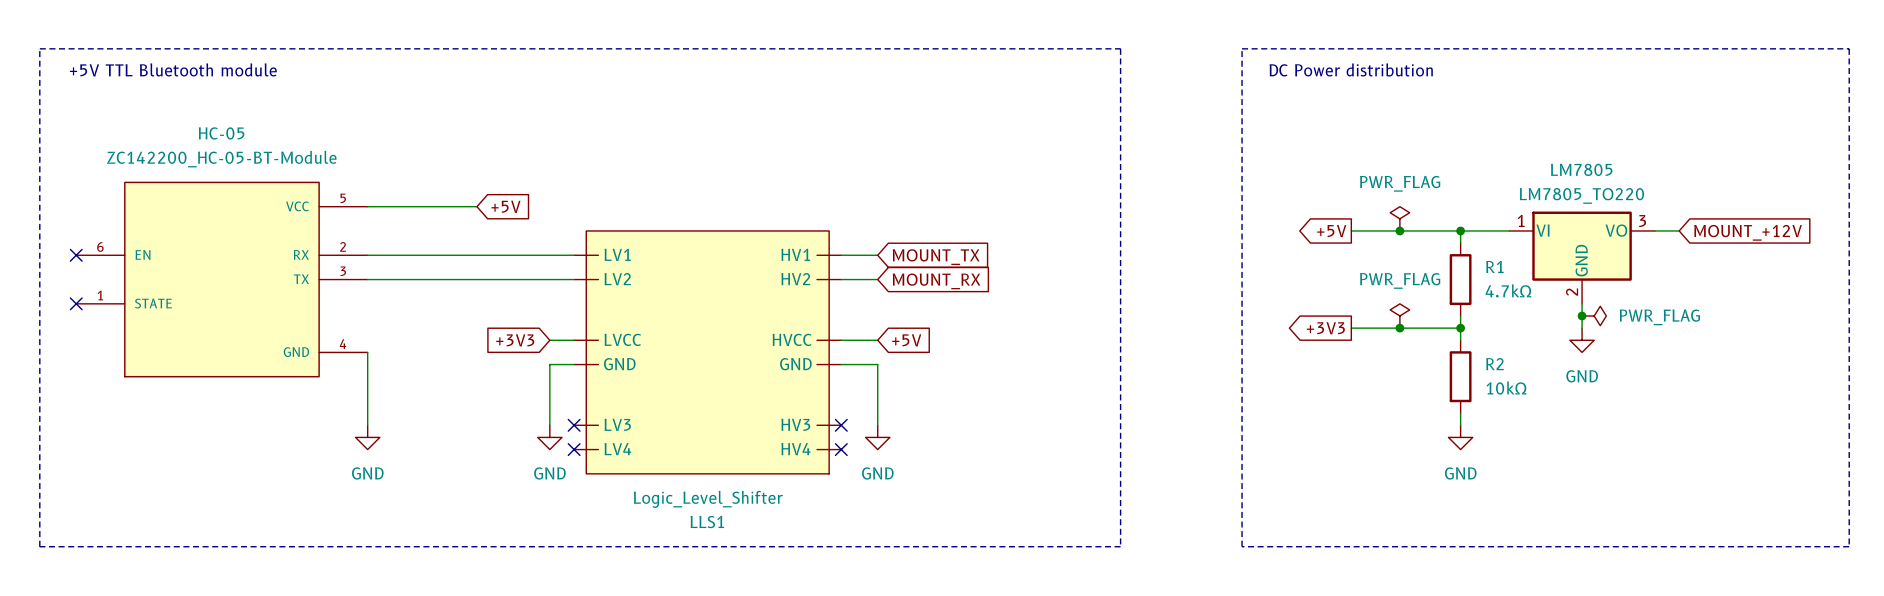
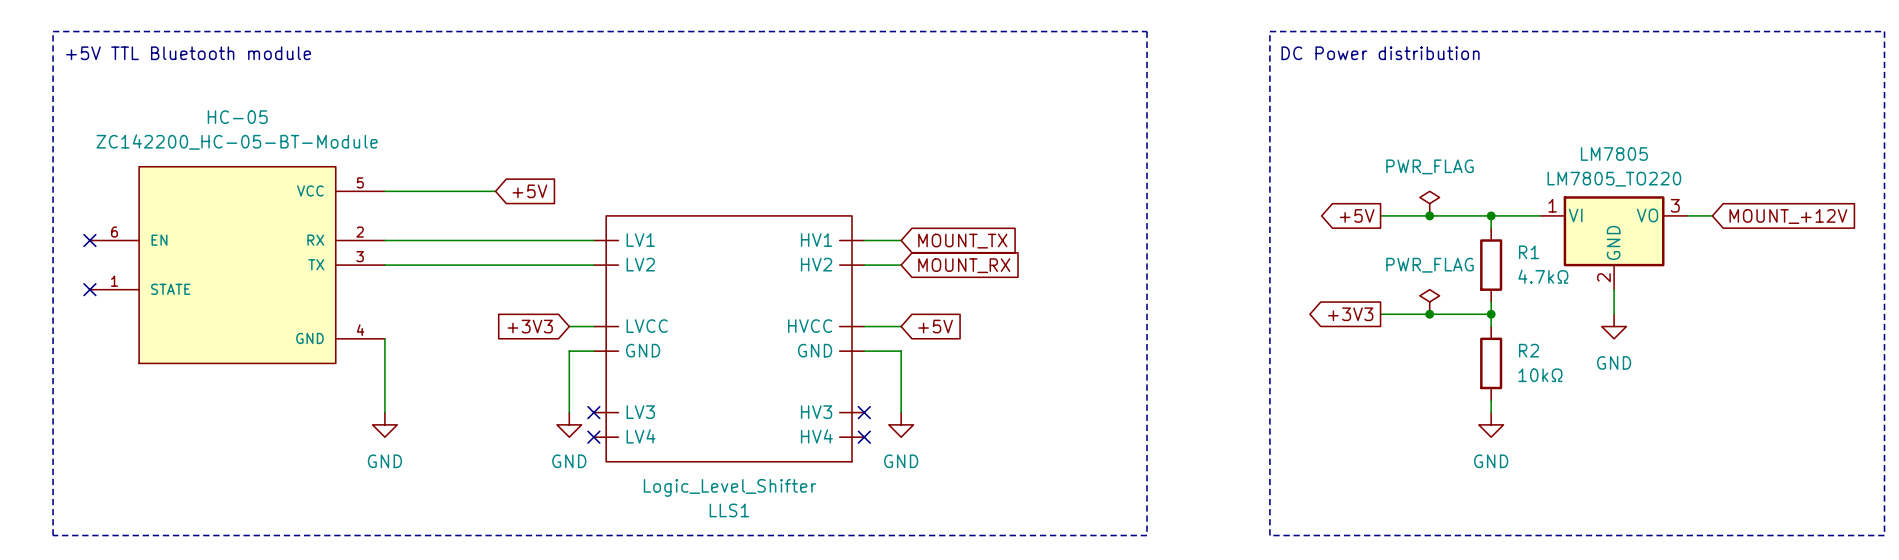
LLS1 symbol: [574, 230, 842, 474] -> [593, 215, 865, 462]
junction: (1582, 315) -> none
power symbol: PWR_FLAG (1594, 315) -> none

